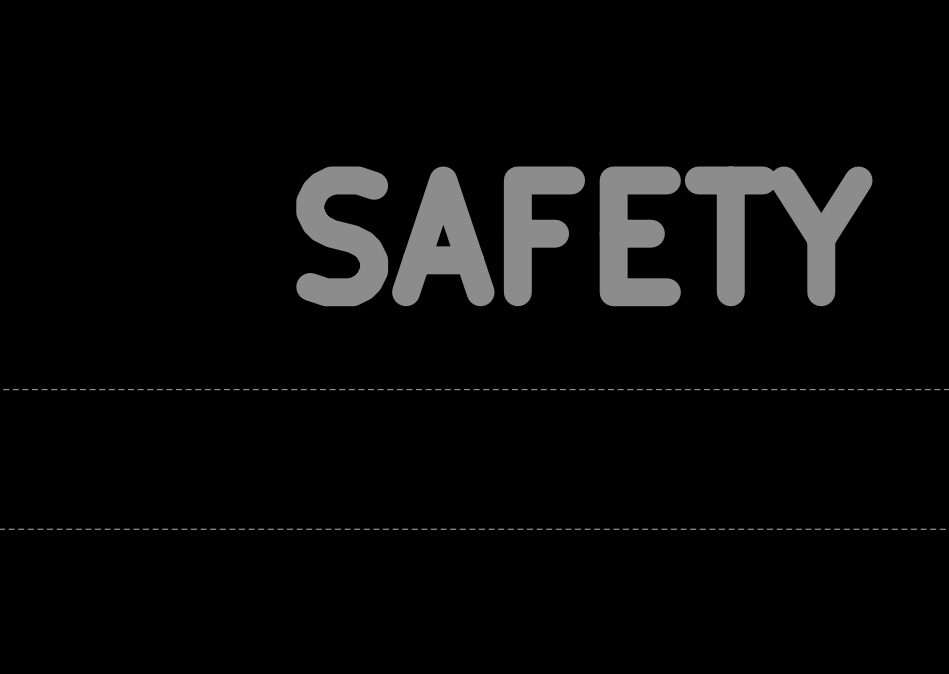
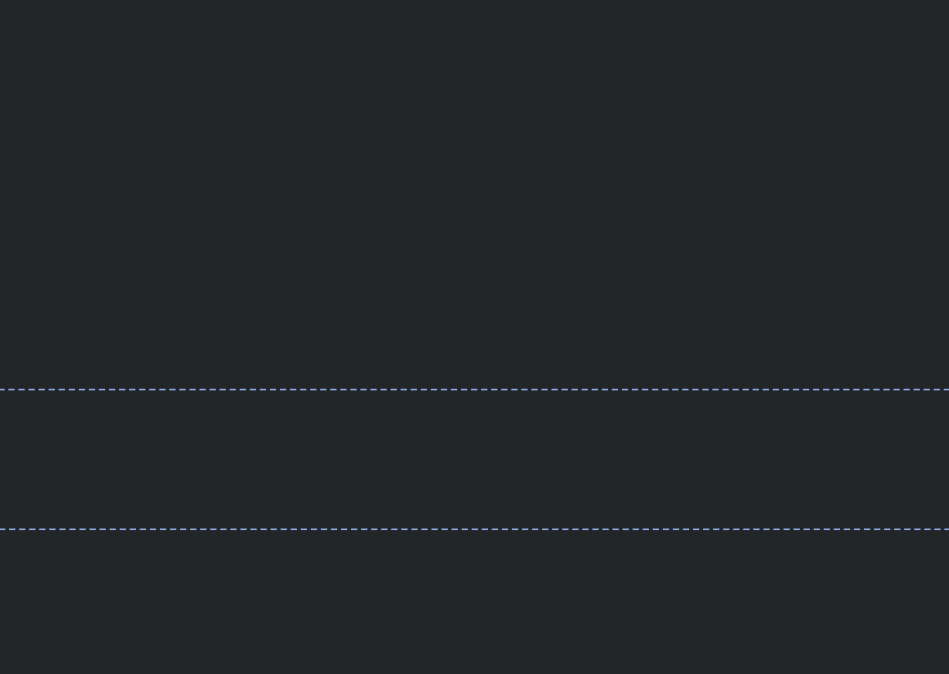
text: SAFETY (584, 236) -> none

